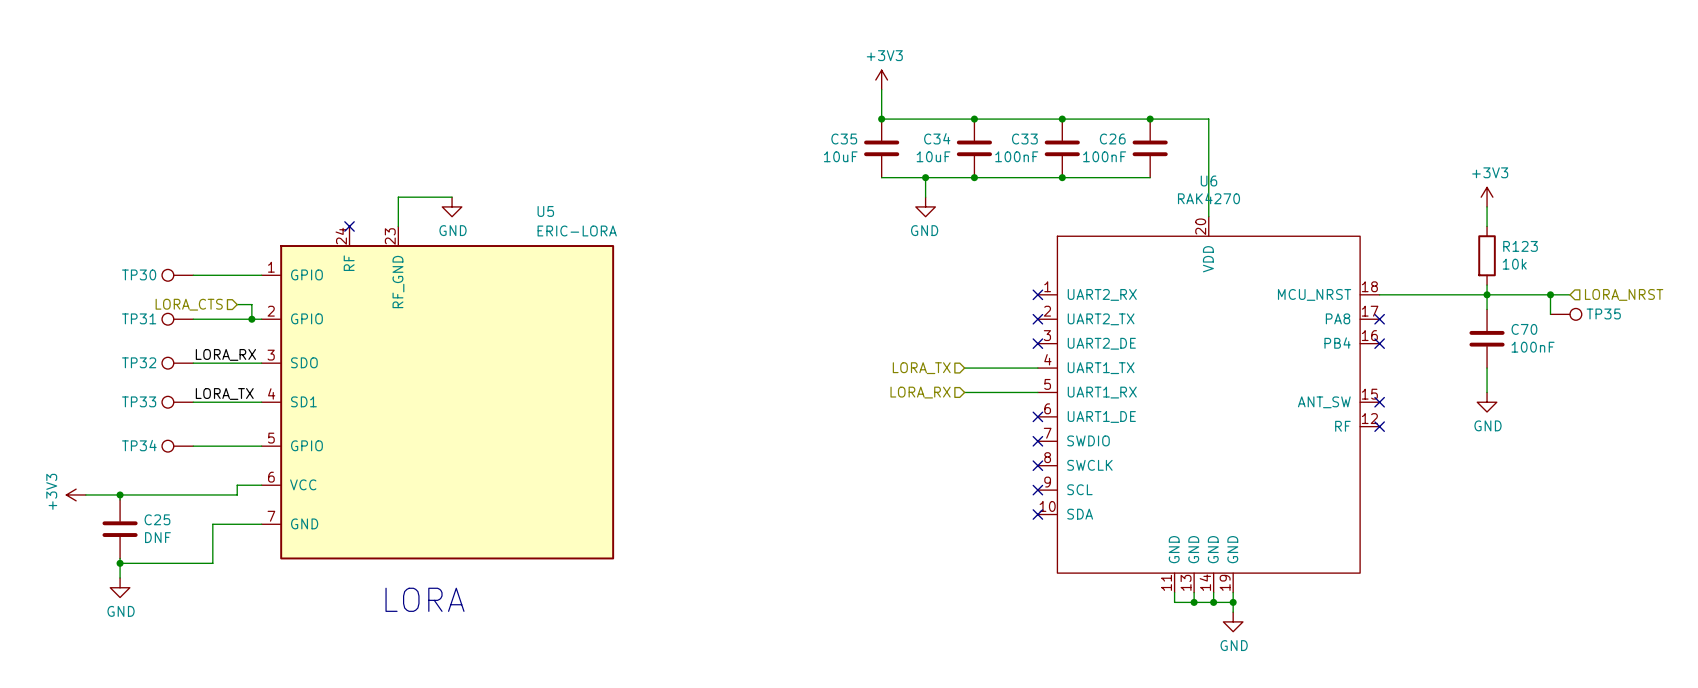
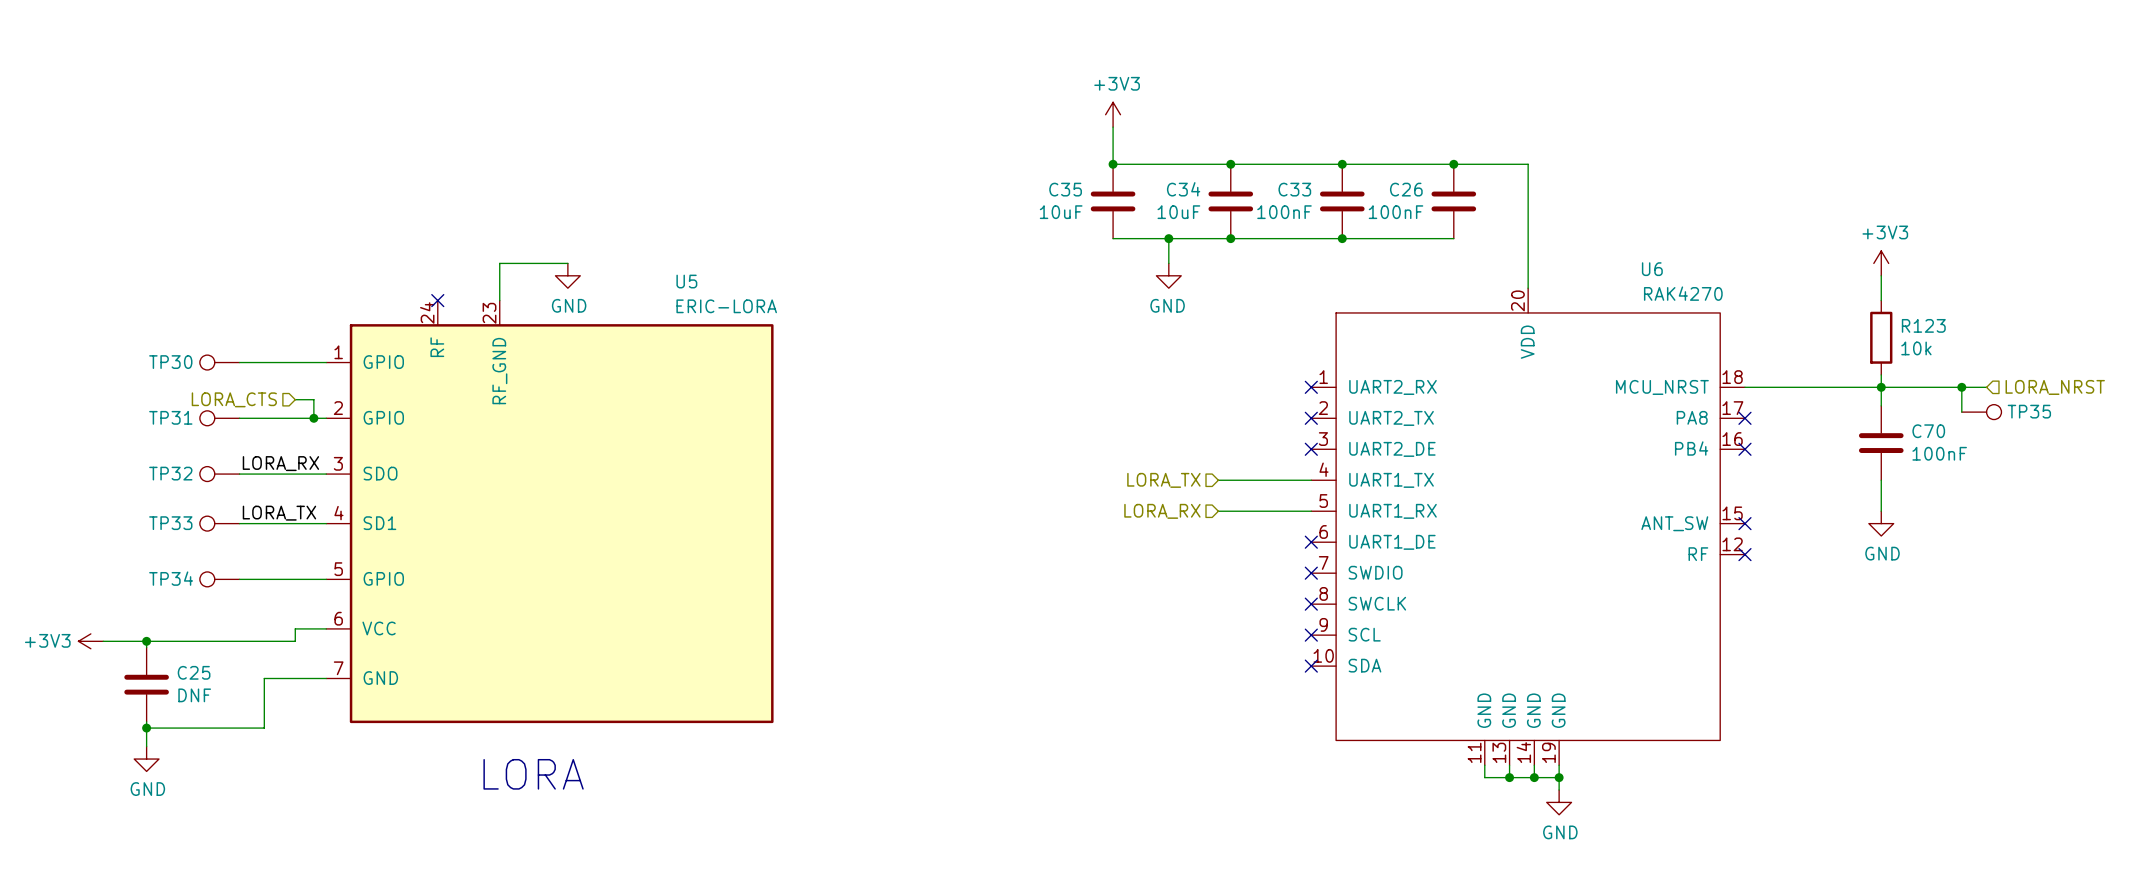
U6 name position: U6 (1208, 181) -> U6 (1652, 269)
U6 value position: RAK4270 (1208, 198) -> RAK4270 (1683, 293)
power symbol text rotation: 0° (51, 491) -> 90° clockwise (47, 640)

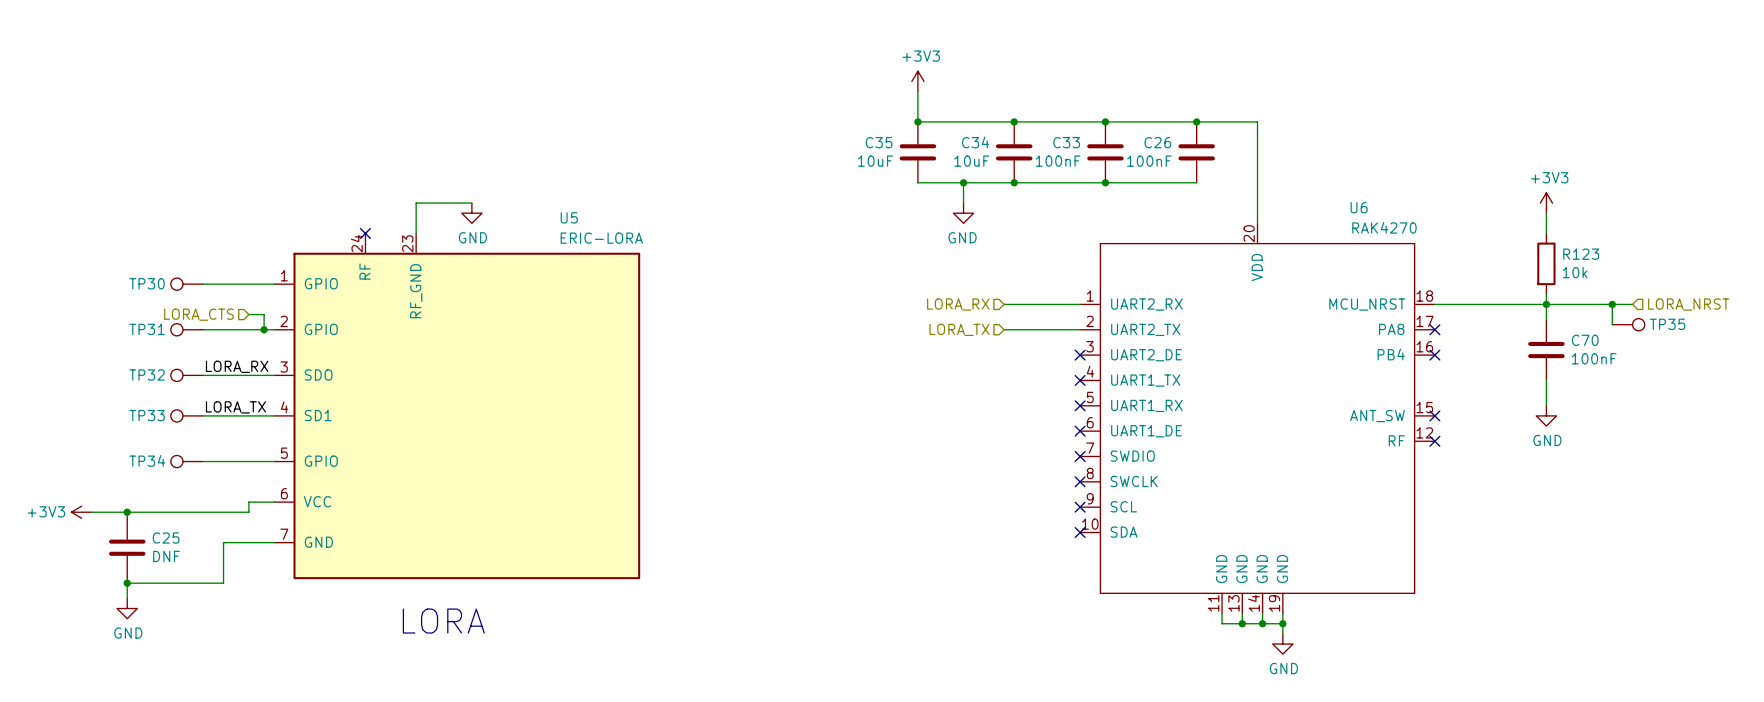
no-connect mark: (1311, 387) -> none
no-connect mark: (1311, 418) -> none
hierarchical label position: LORA_TX (1163, 480) -> LORA_TX (959, 329)
wire: (1218, 480) (1311, 480) -> (1004, 329) (1080, 329)
no-connect mark: none -> (1080, 380)
hierarchical label position: LORA_RX (1162, 511) -> LORA_RX (958, 304)
wire: (1218, 511) (1311, 511) -> (1004, 304) (1080, 304)
no-connect mark: none -> (1080, 405)

